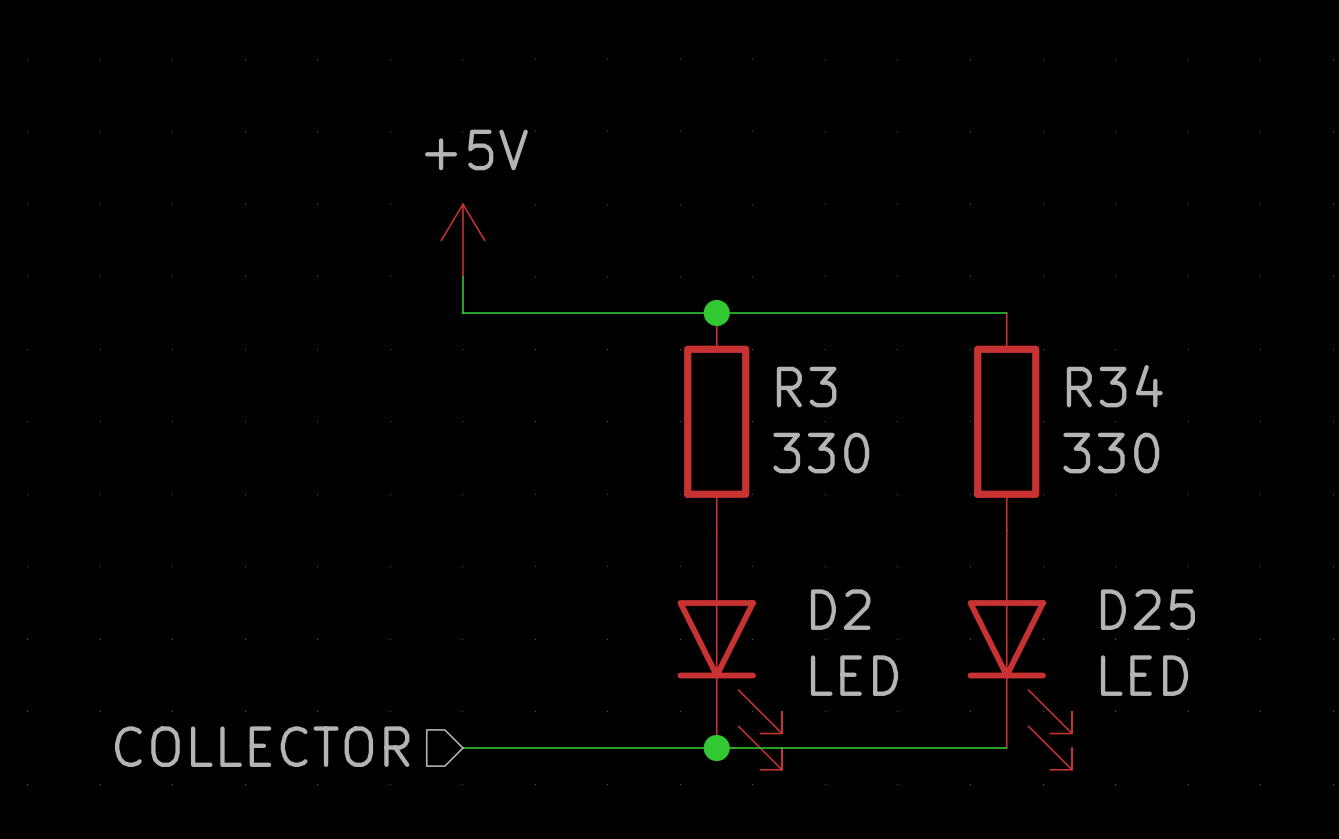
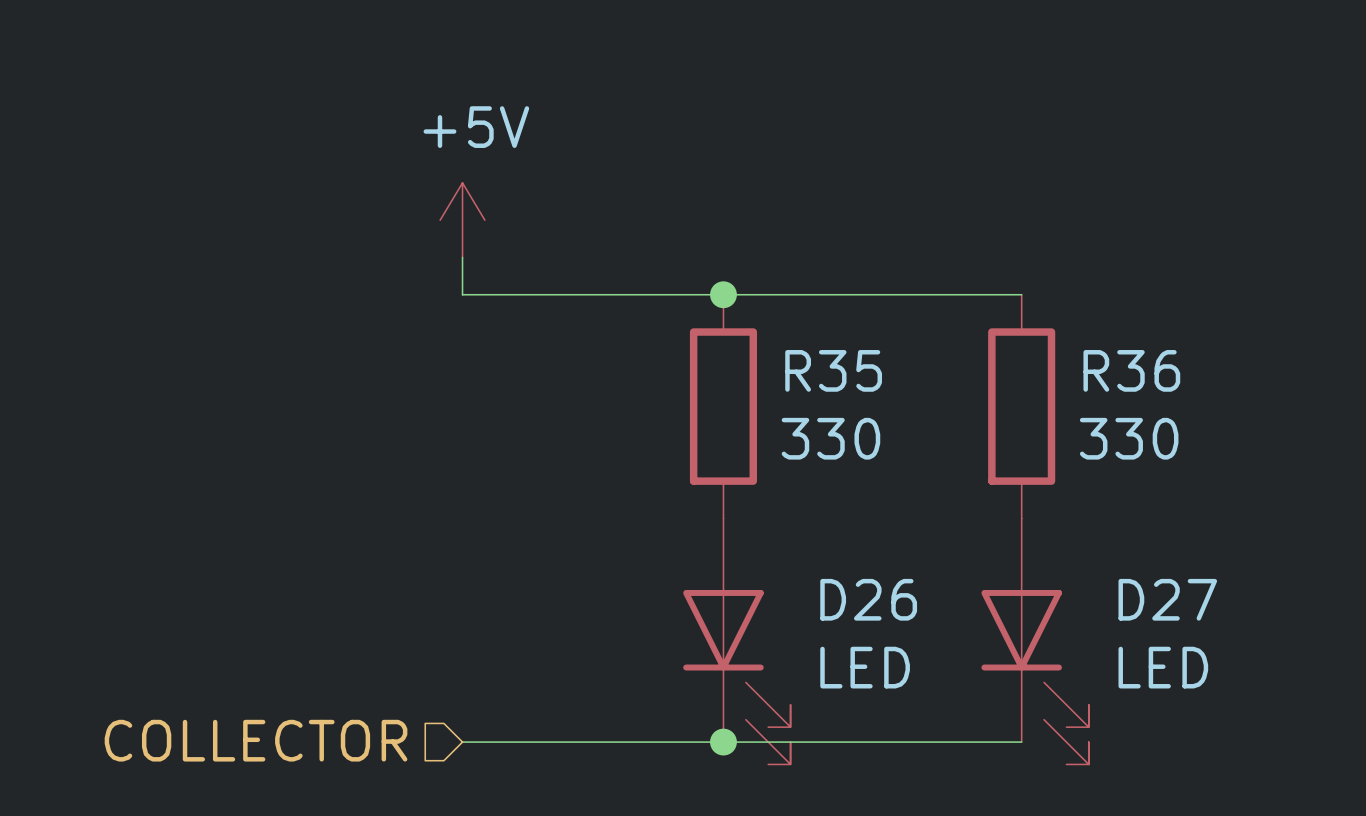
R34 name: R34 (1114, 386) -> R36 (1131, 370)
R3 name: R3 (806, 387) -> R35 (833, 370)
D2 name: D2 (840, 609) -> D26 (868, 599)
D25 name: D25 (1147, 609) -> D27 (1167, 599)

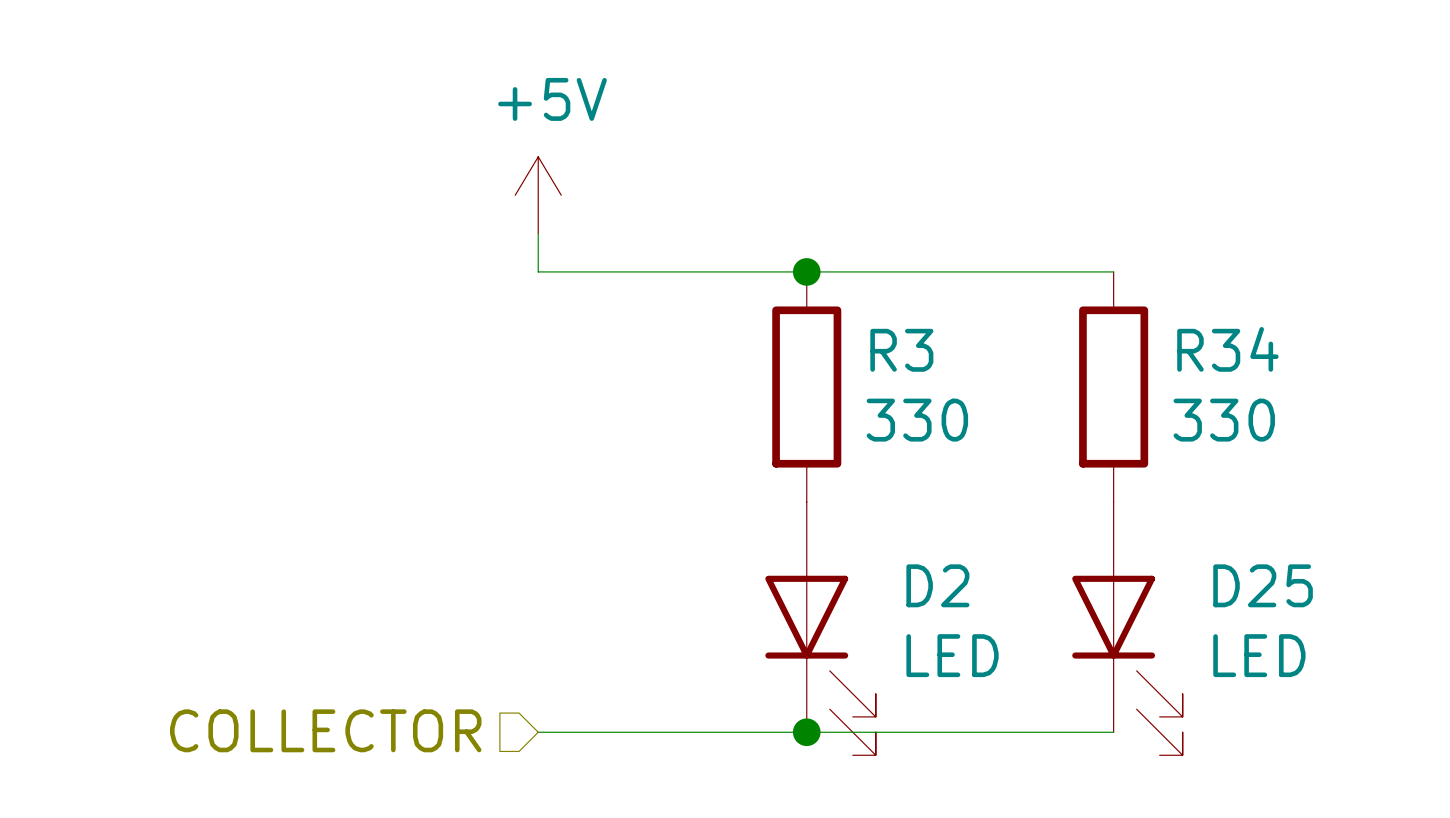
R35 name: R35 (833, 370) -> R3 (901, 350)
R36 name: R36 (1131, 370) -> R34 (1227, 349)
D26 name: D26 (868, 599) -> D2 (937, 585)
D27 name: D27 (1167, 599) -> D25 (1263, 585)

